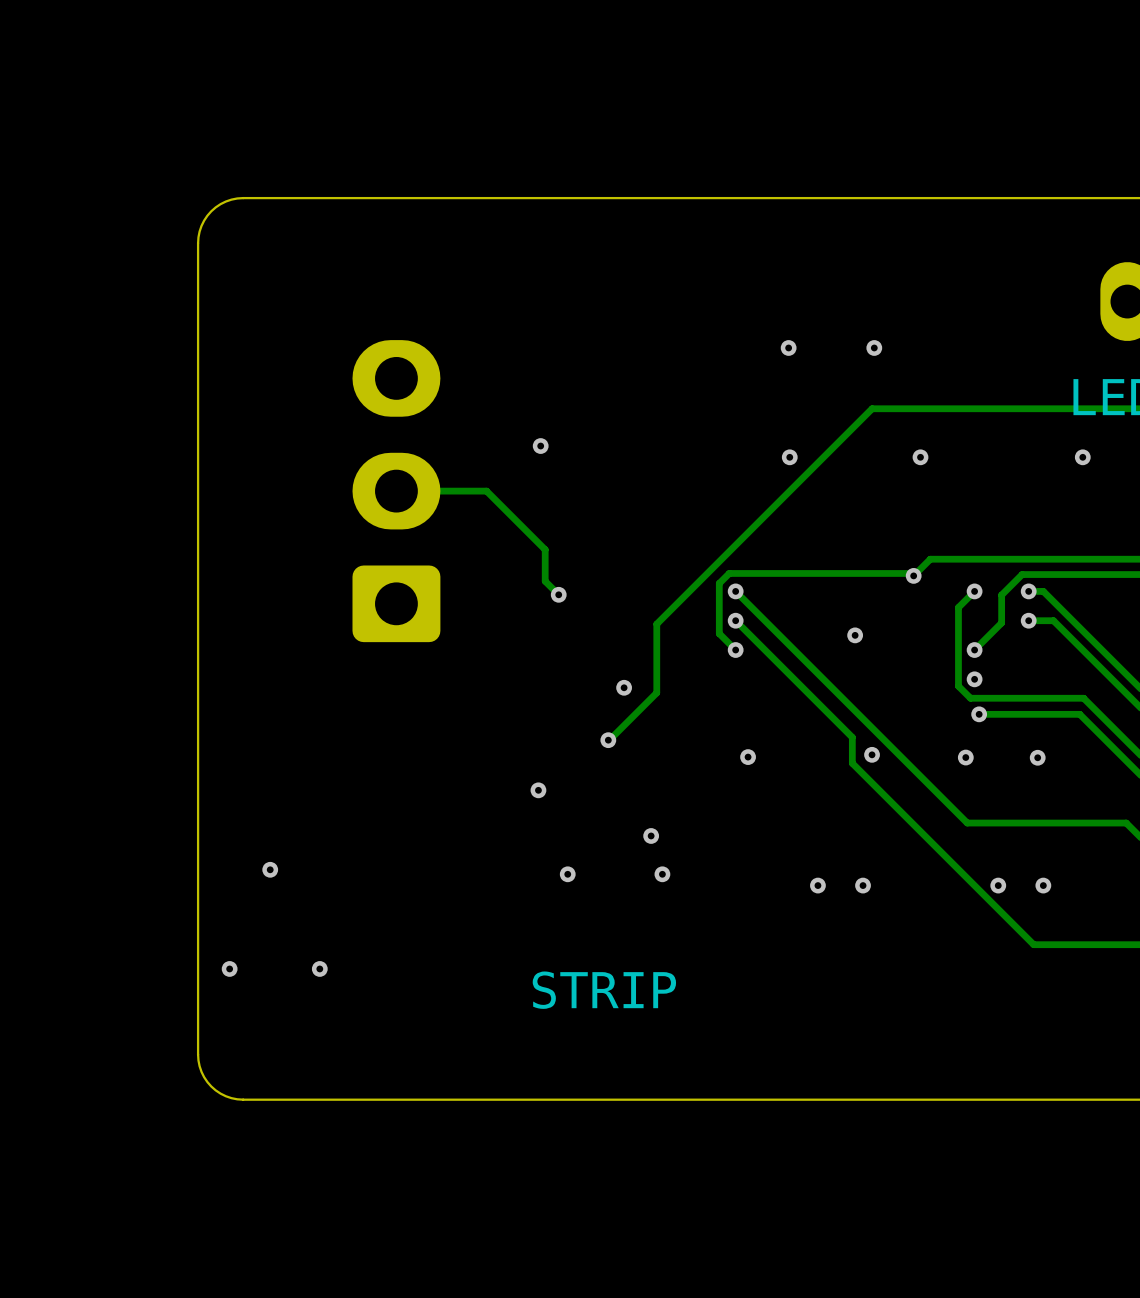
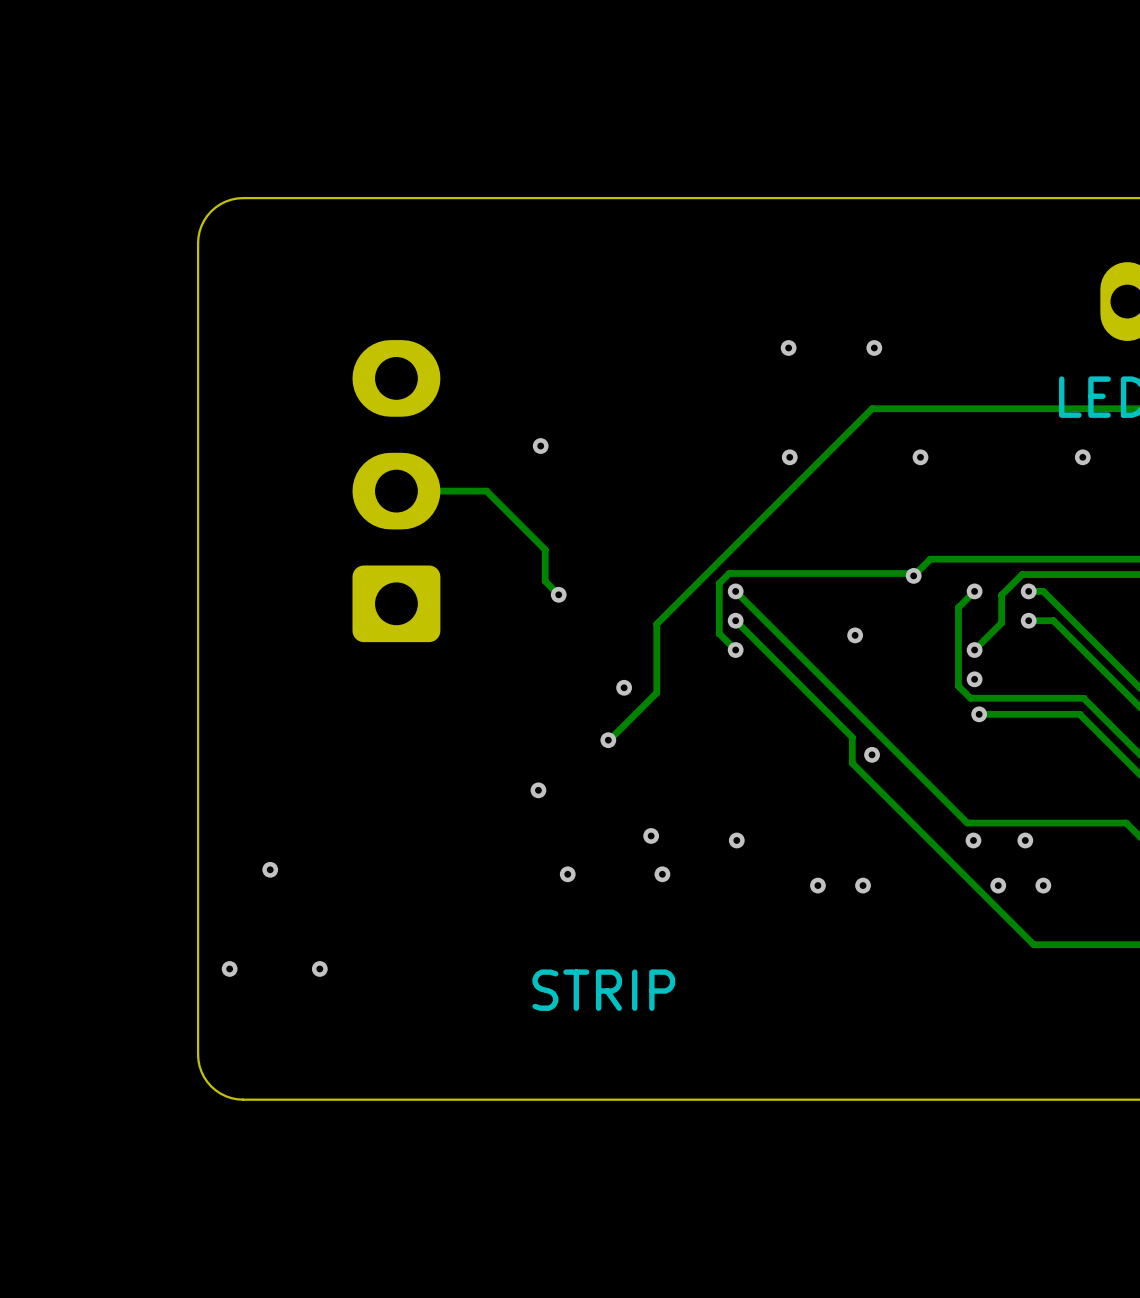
via position: (748, 757) -> (736, 840)
via: (965, 757) -> none
via: (1037, 757) -> none
via: none -> (973, 840)
via: none -> (1025, 840)

